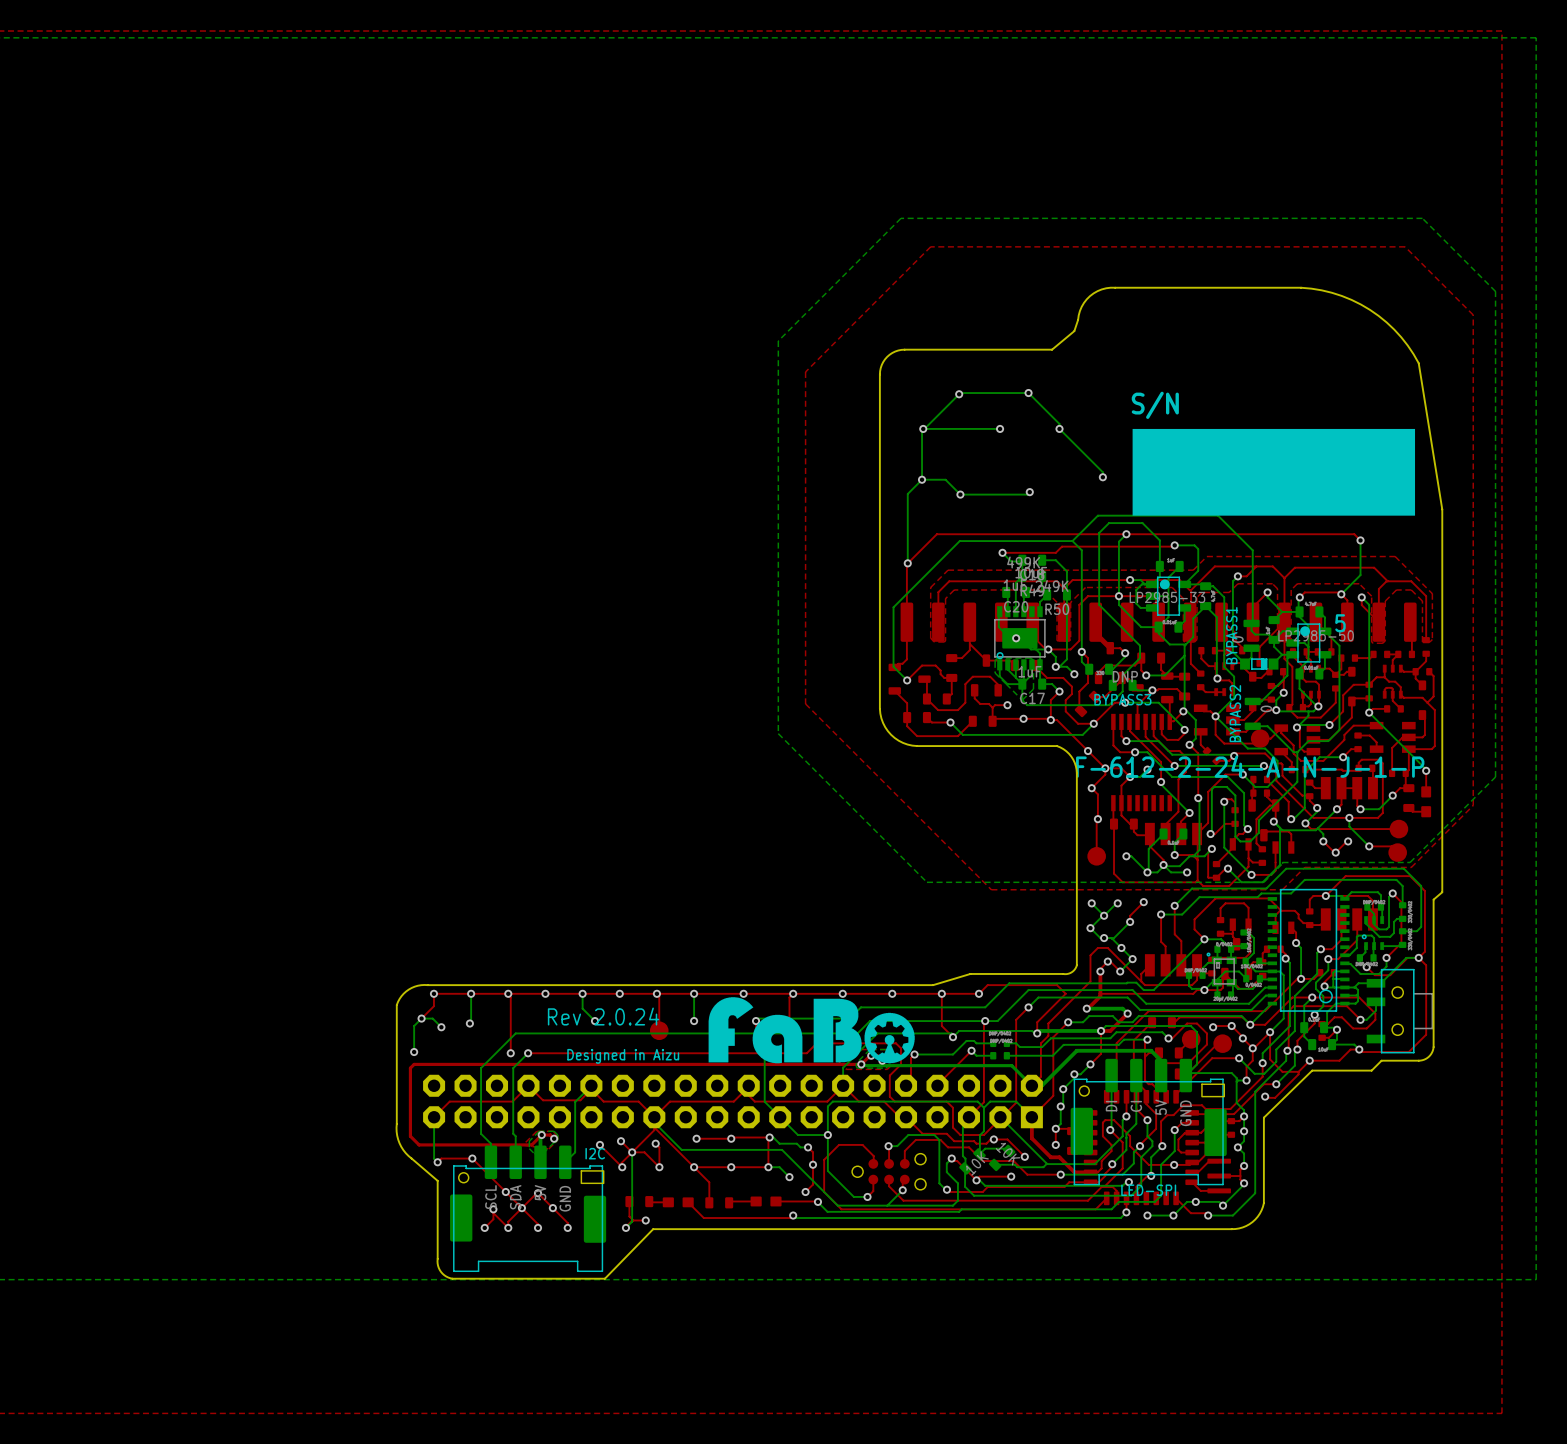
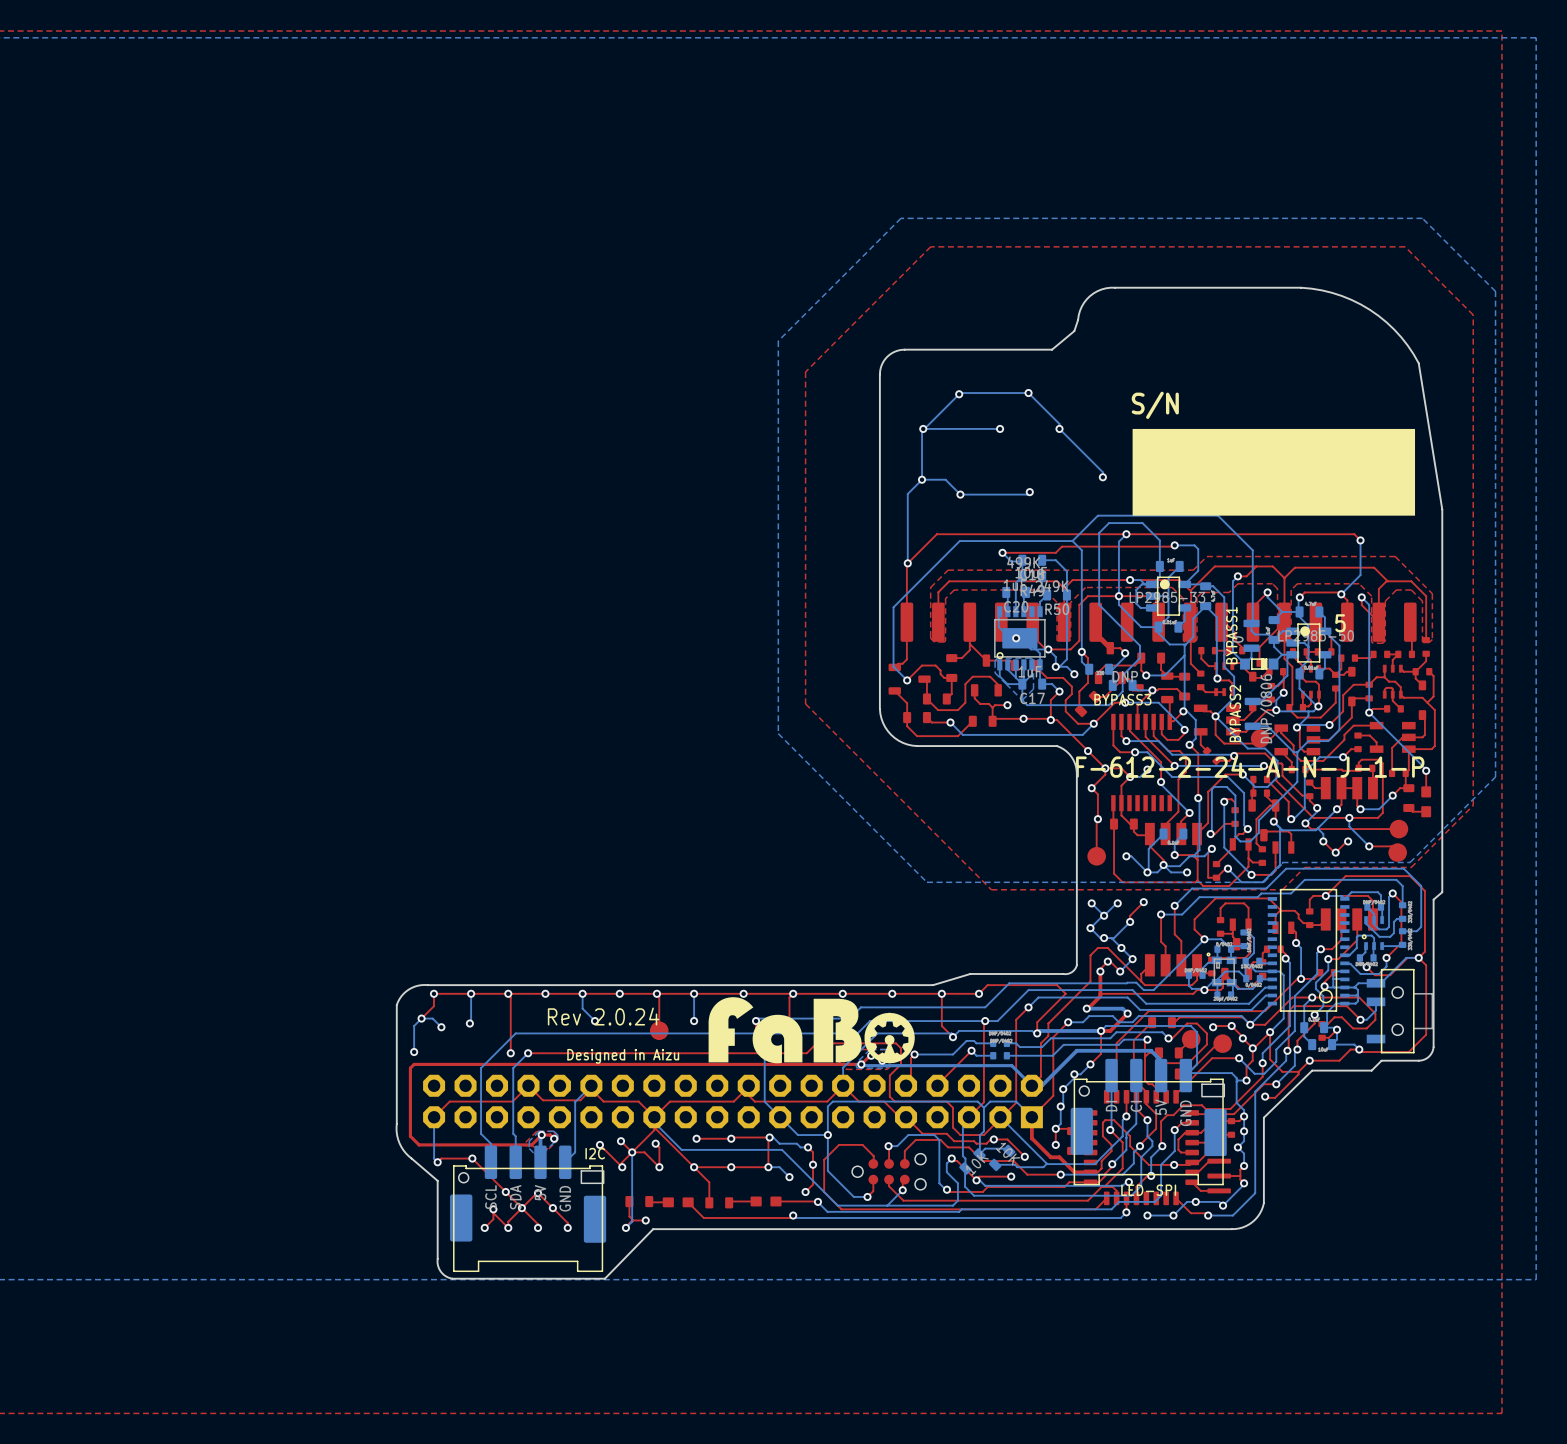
BYPASS2 value: 0 (1266, 708) -> DNP/0806 (1267, 708)

